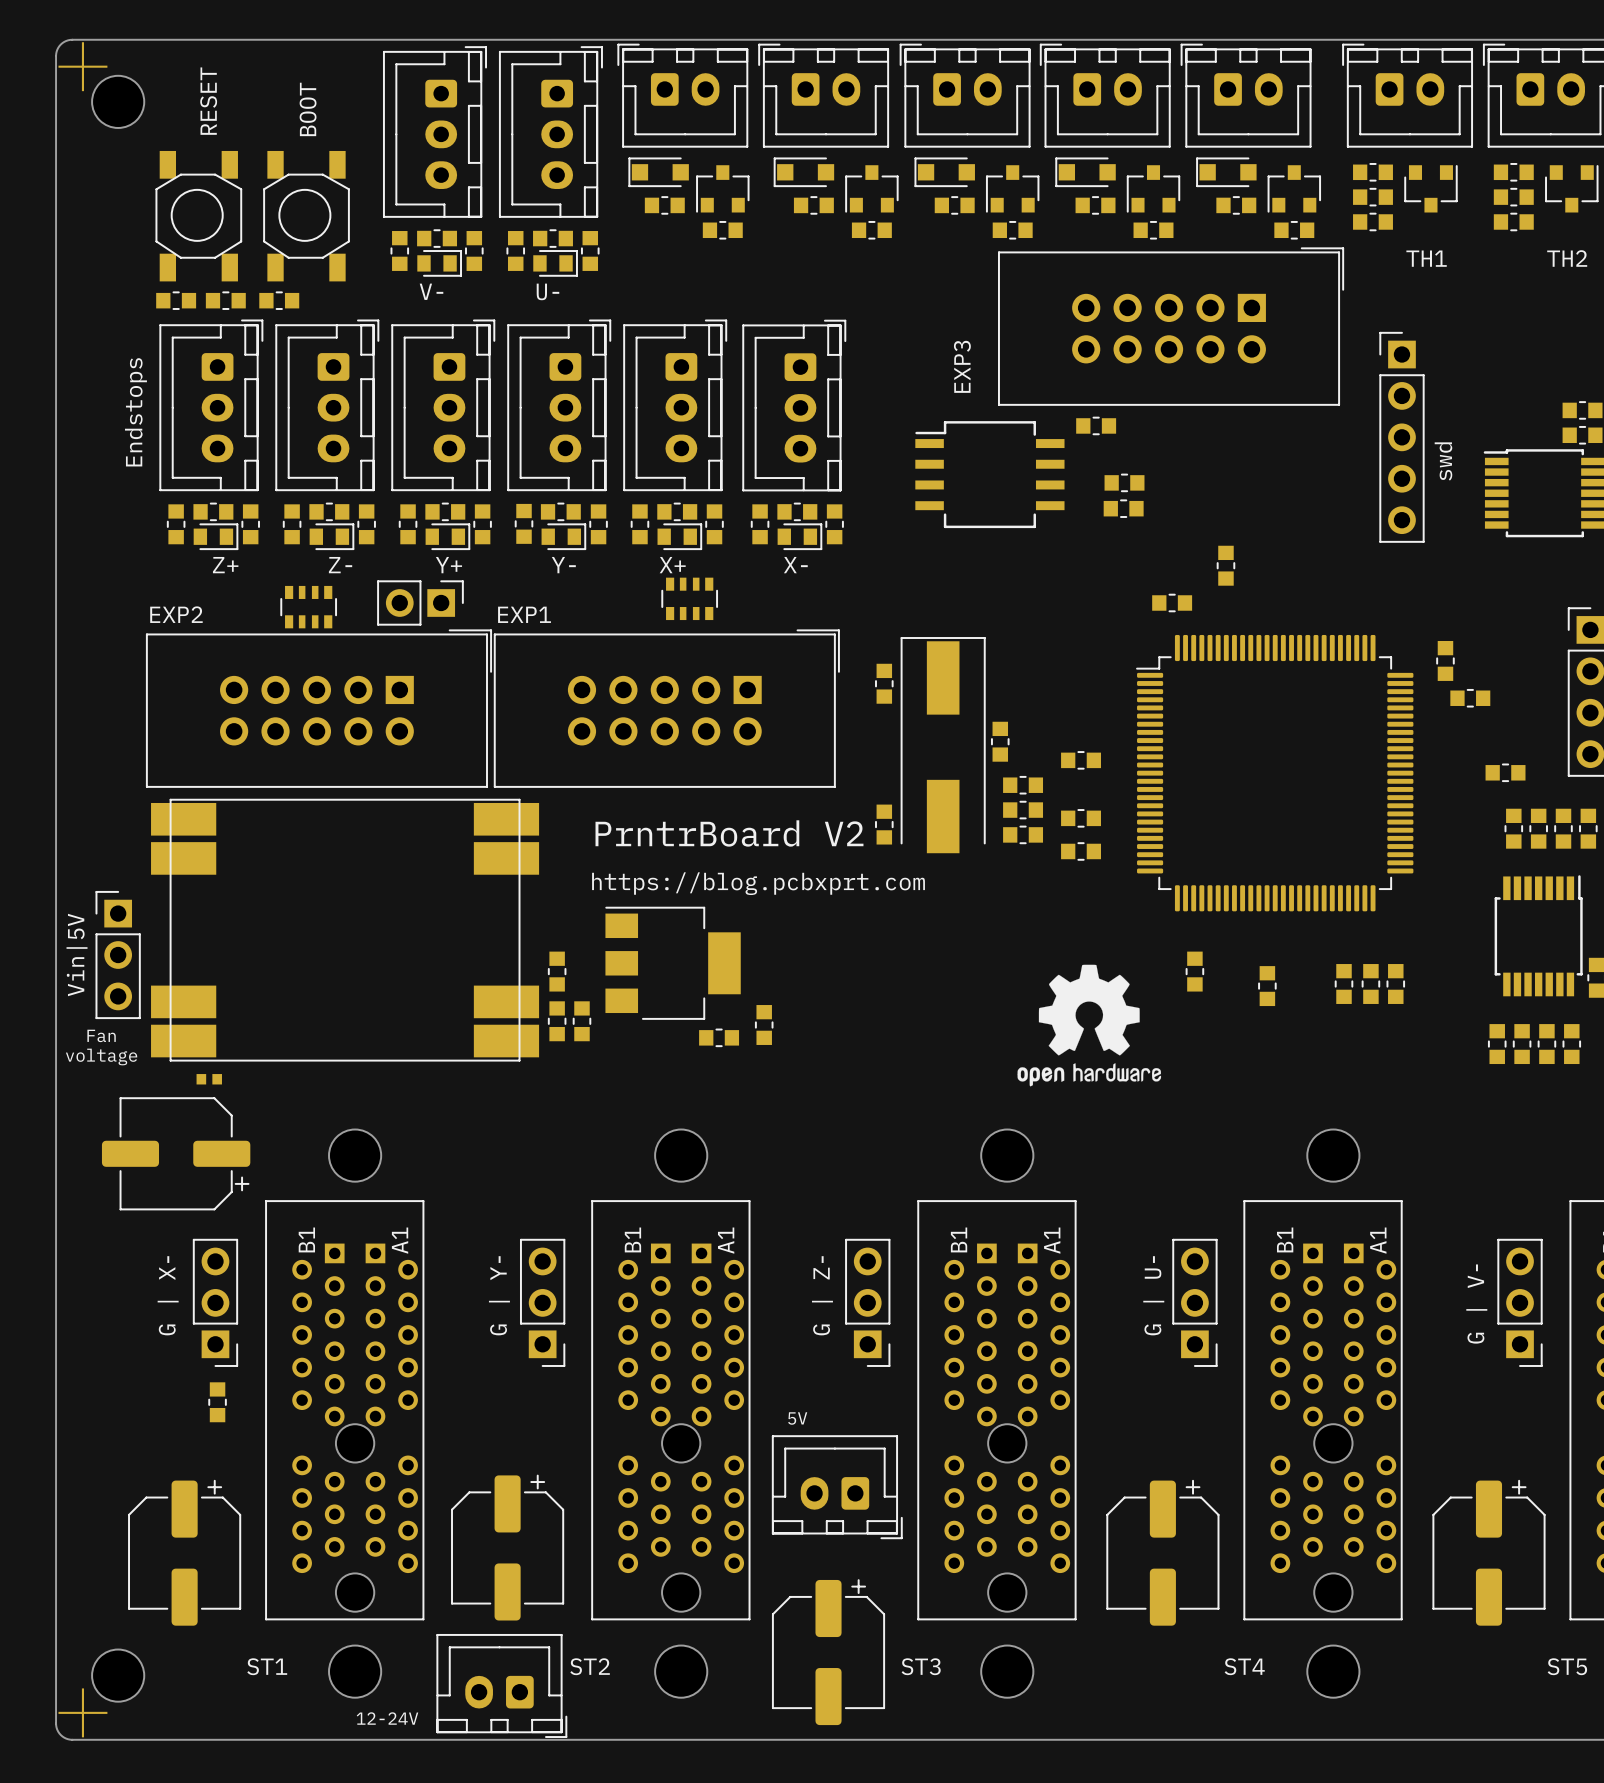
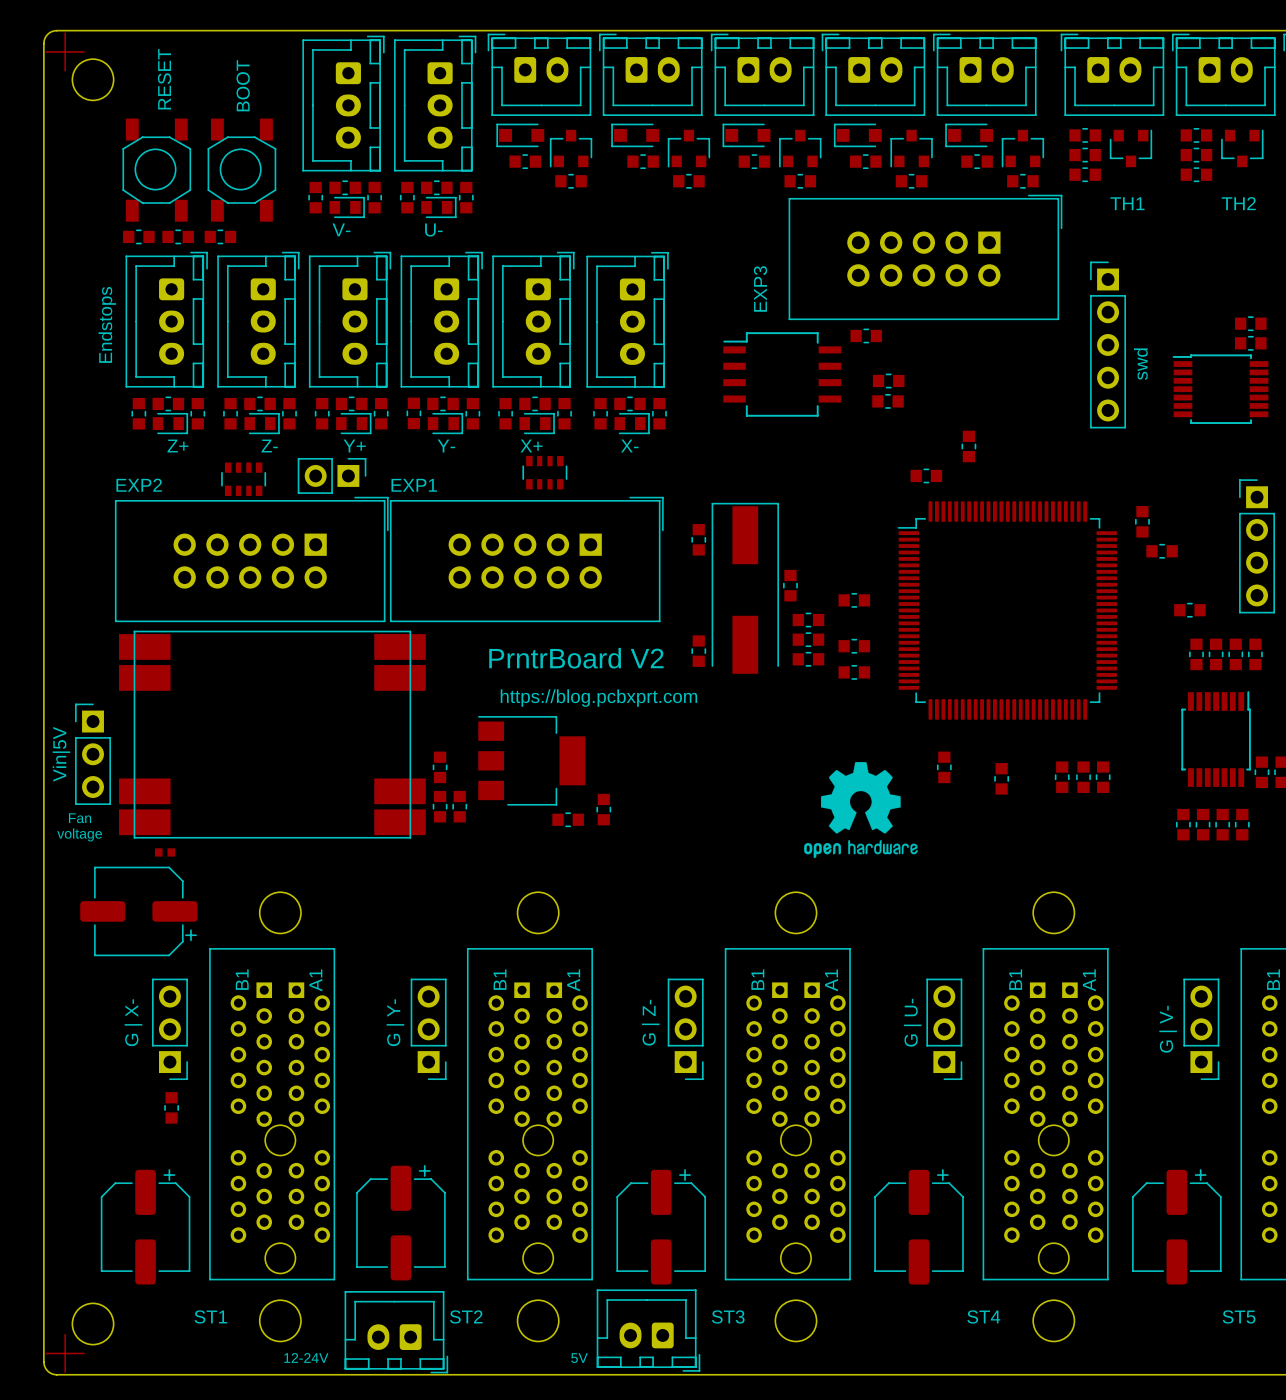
text position: 5V (797, 1418) -> 5V (579, 1358)
part position: (837, 1487) -> (648, 1330)
part position: (828, 1652) -> (661, 1226)

